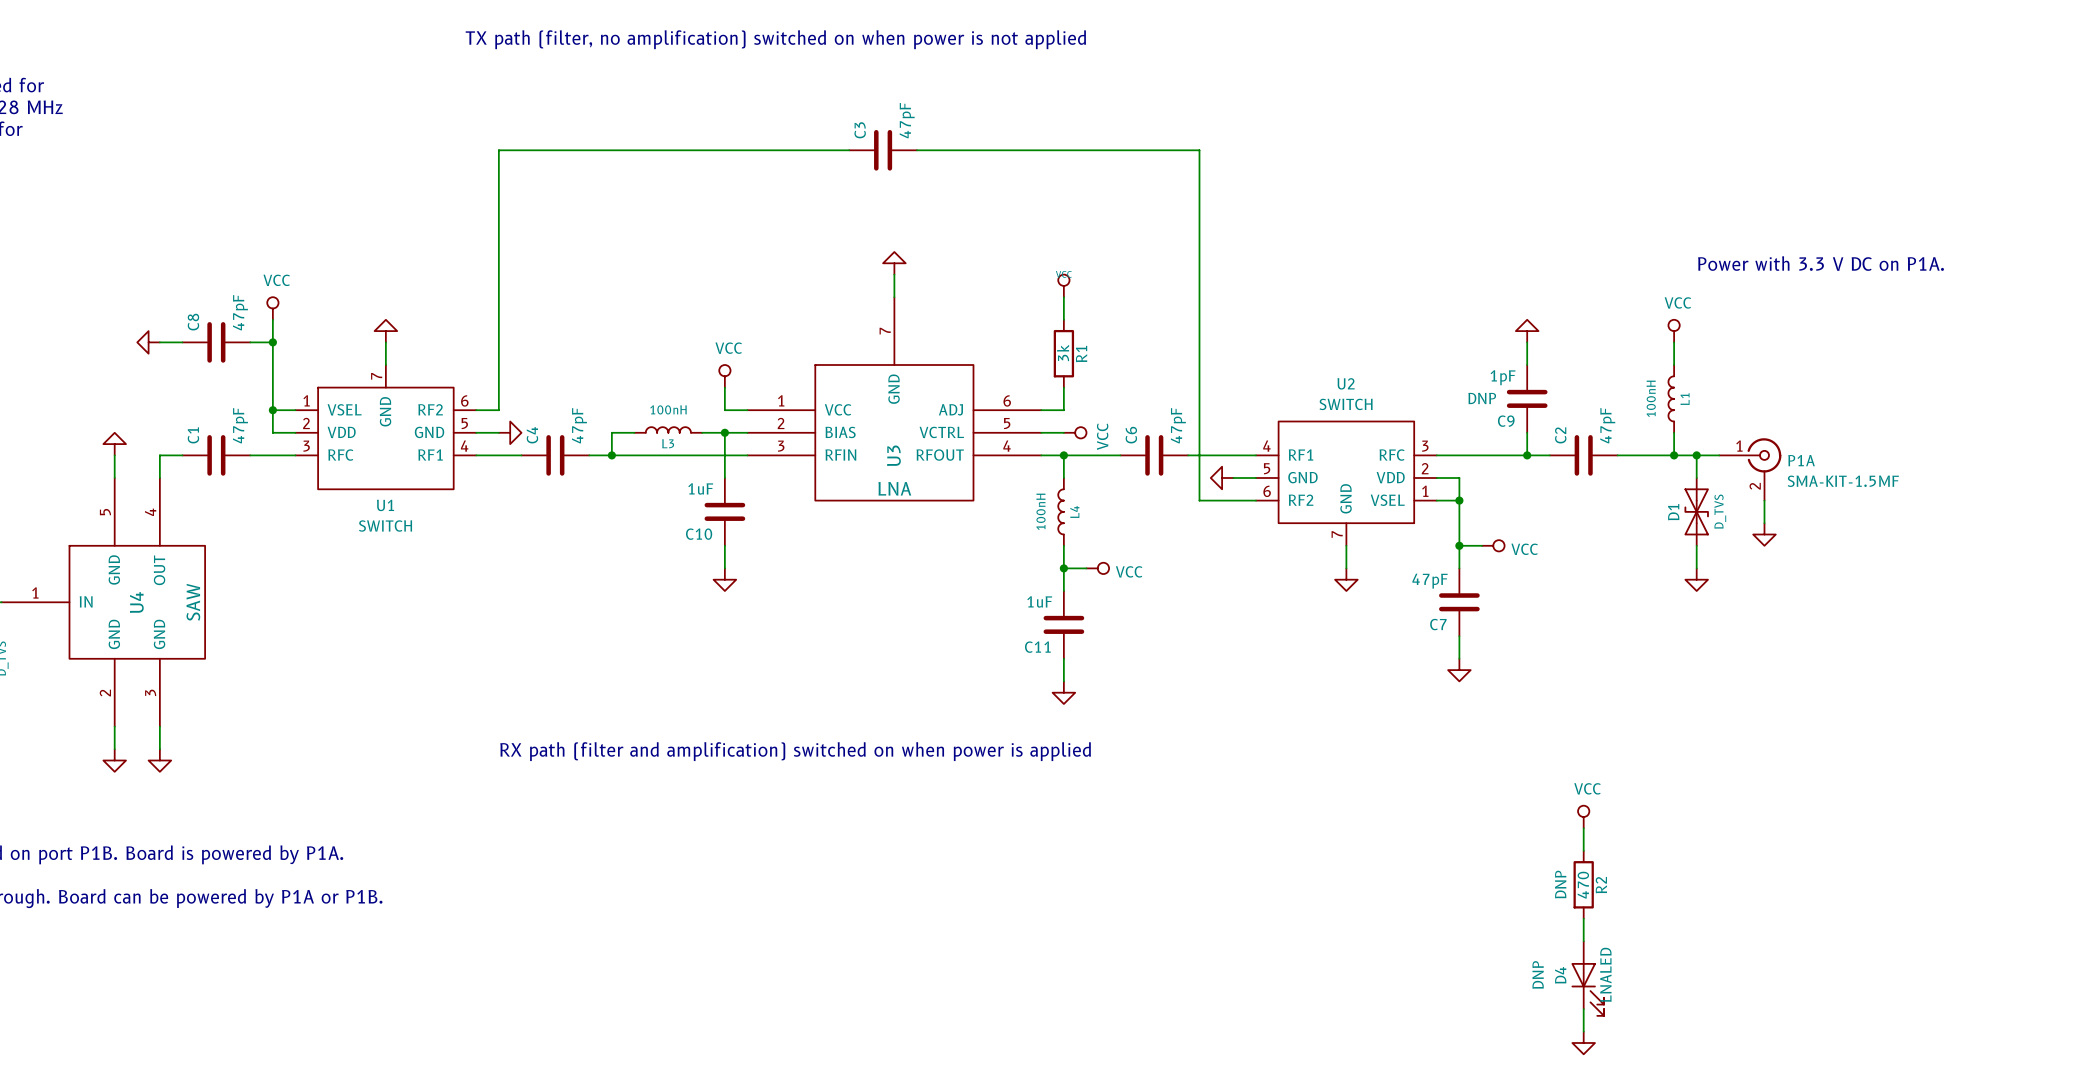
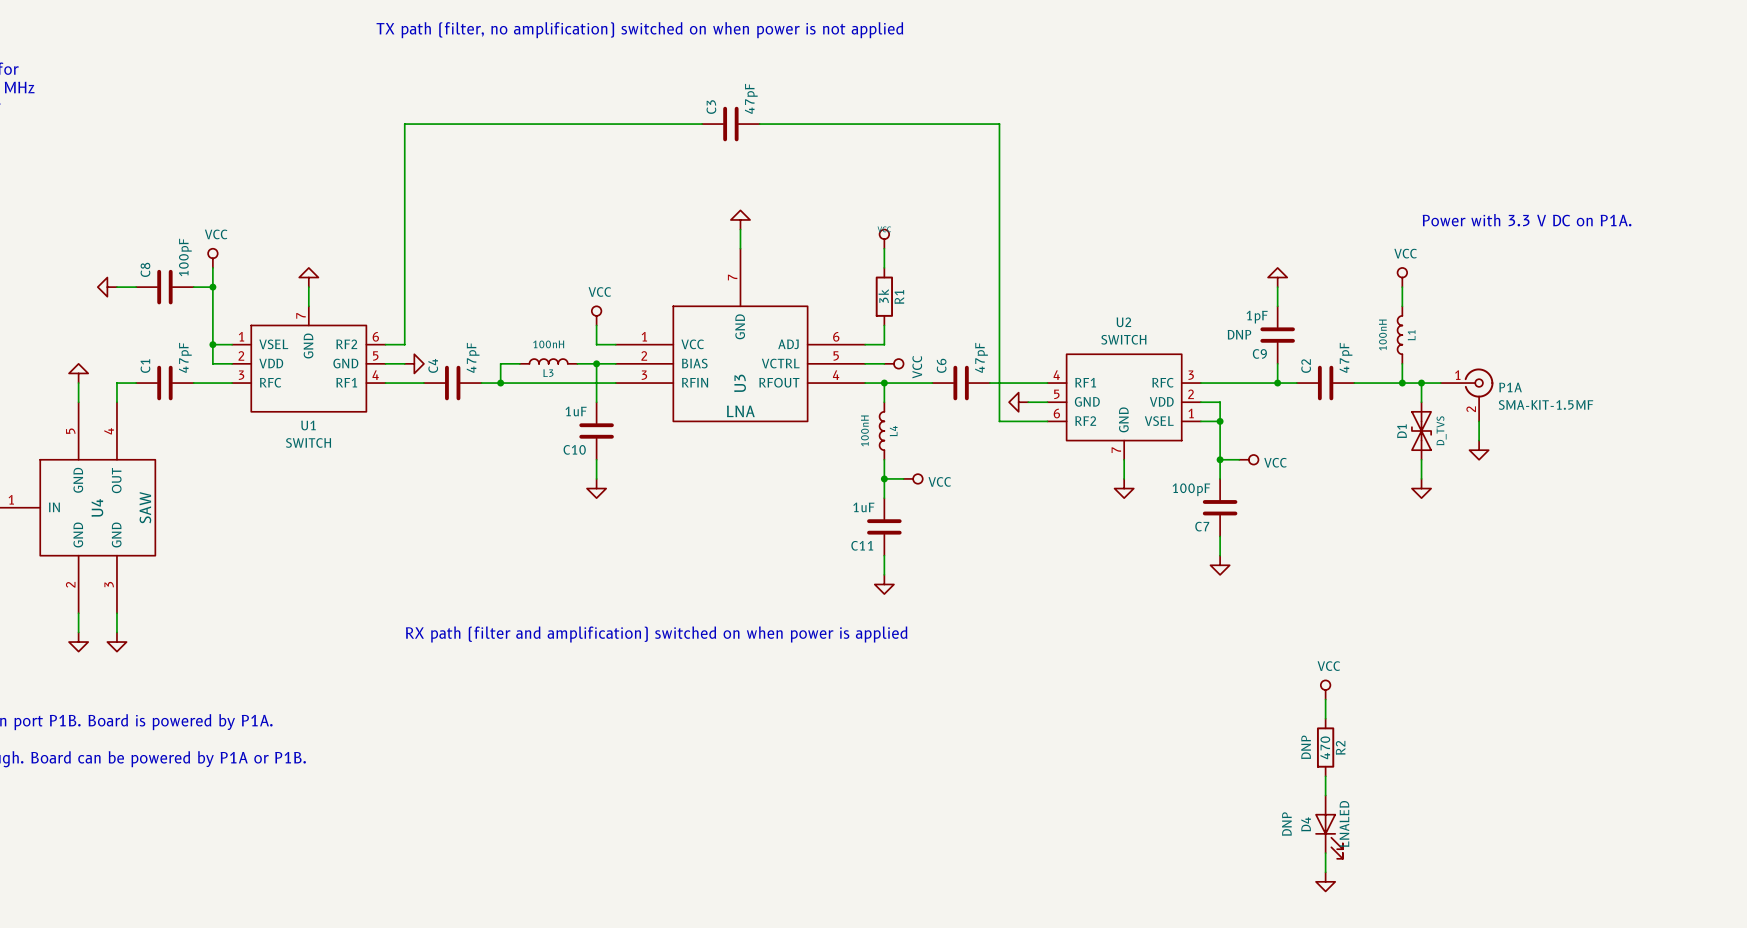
C8 value: 47pF (240, 312) -> 100pF (185, 257)
C7 value: 47pF (1430, 581) -> 100pF (1191, 489)

